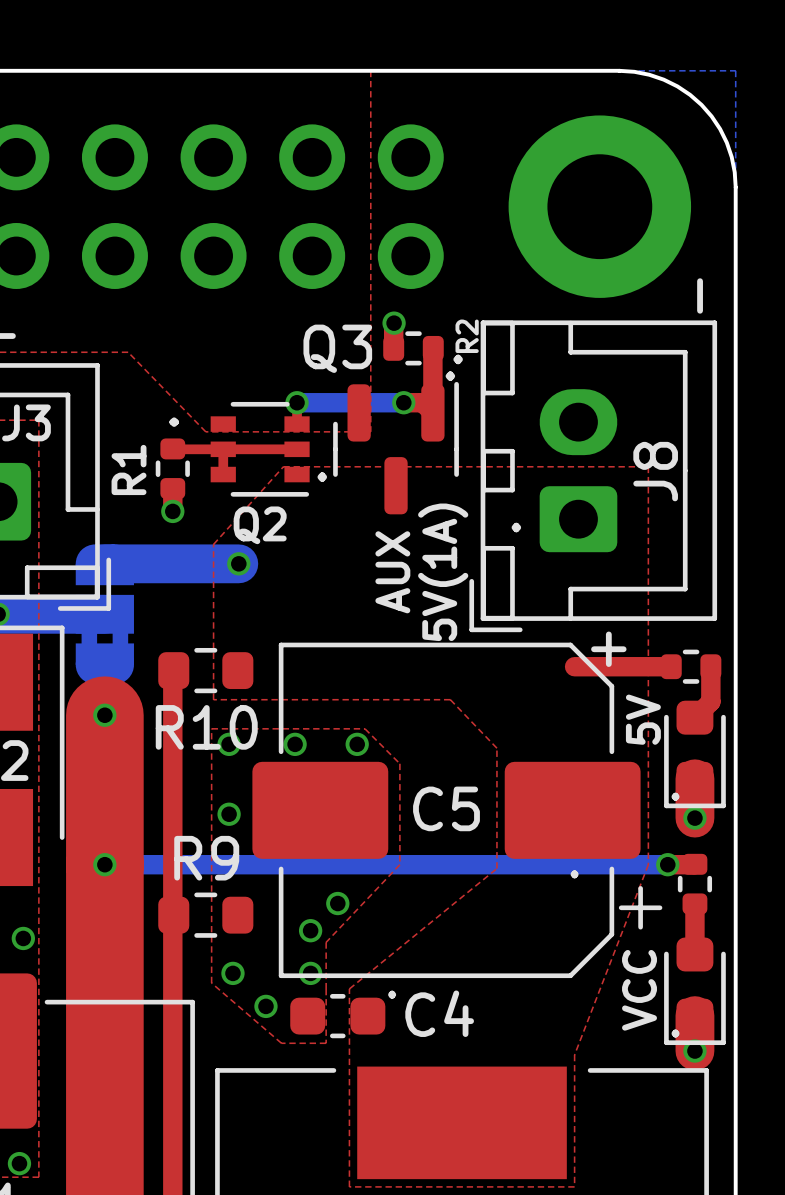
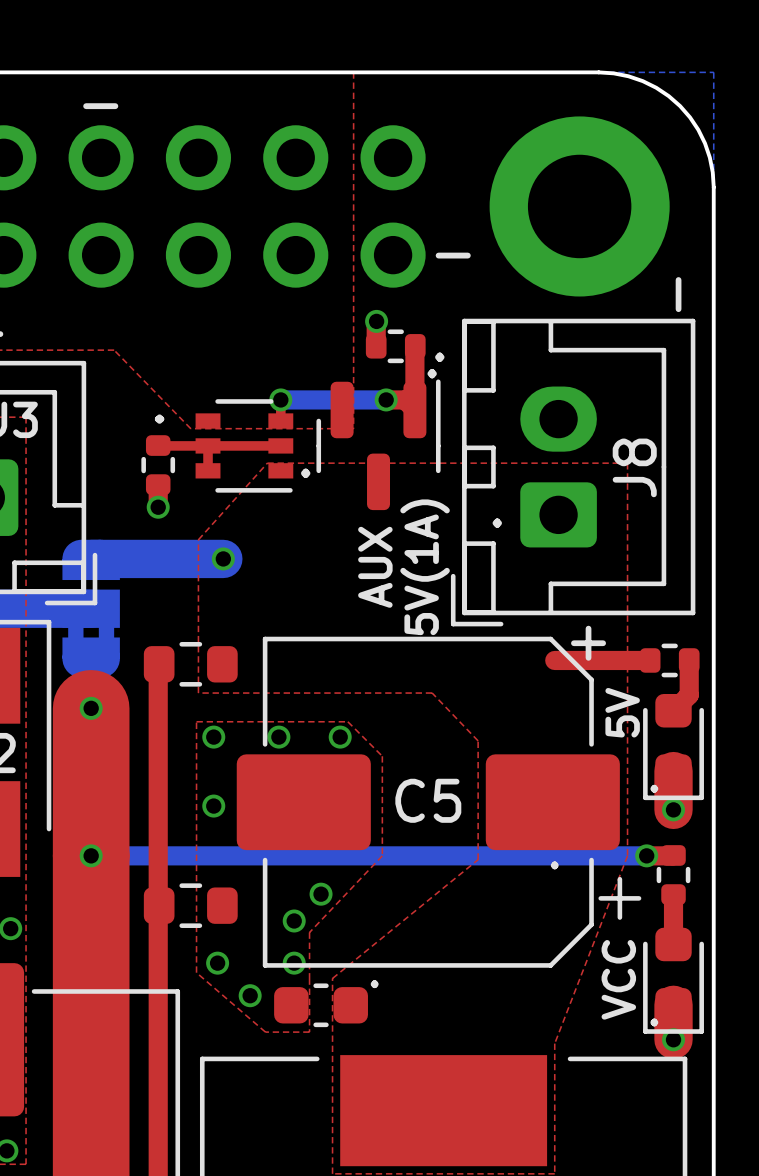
text: none -> - (100, 106)
text: none -> - (453, 255)
R2 name: R2 (467, 336) -> none
Q3 name: Q3 (337, 348) -> none
R1 name: R1 (129, 469) -> none
Q2 name: Q2 (260, 525) -> none
R10 name: R10 (206, 727) -> none
R9 name: R9 (206, 858) -> none
C4 name: C4 (439, 1013) -> none

